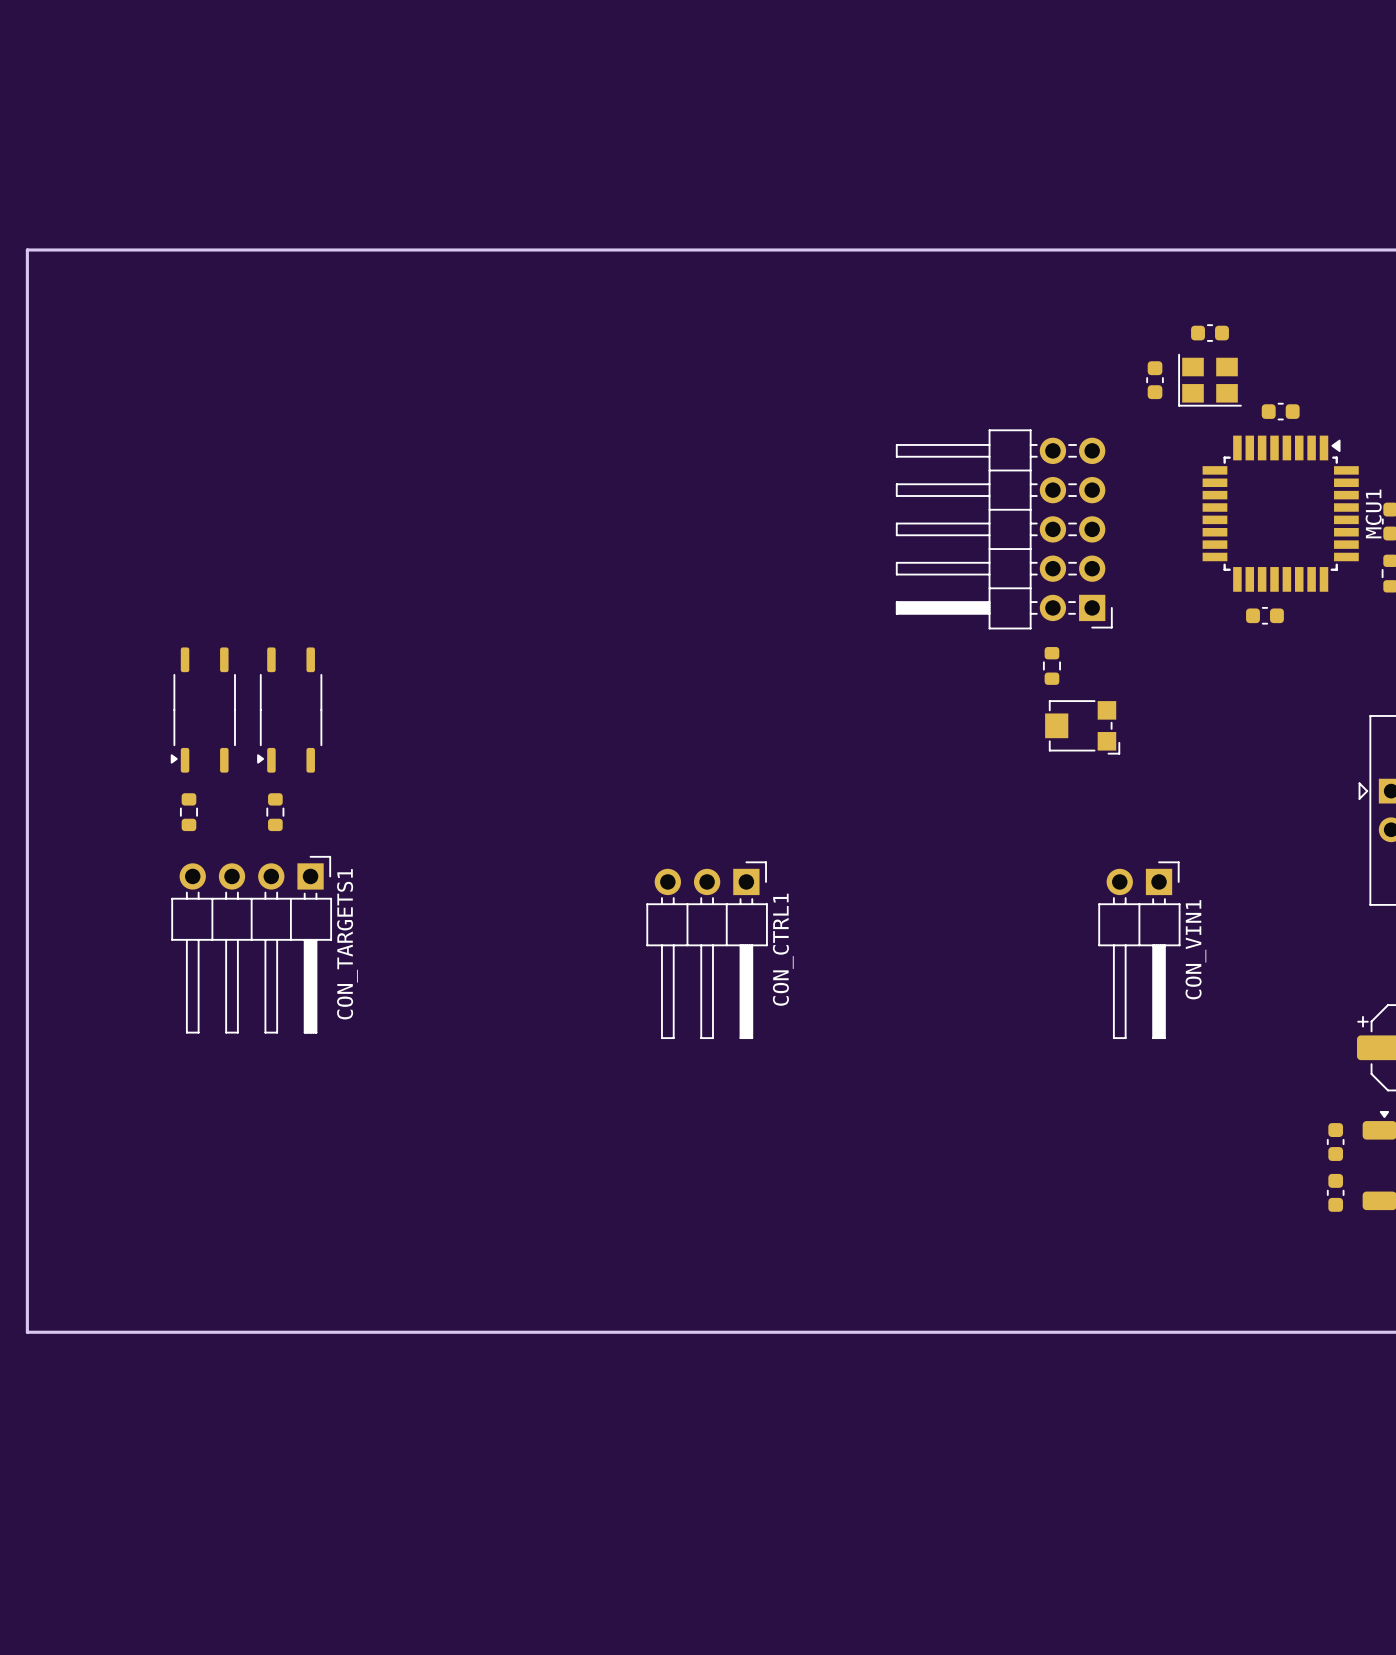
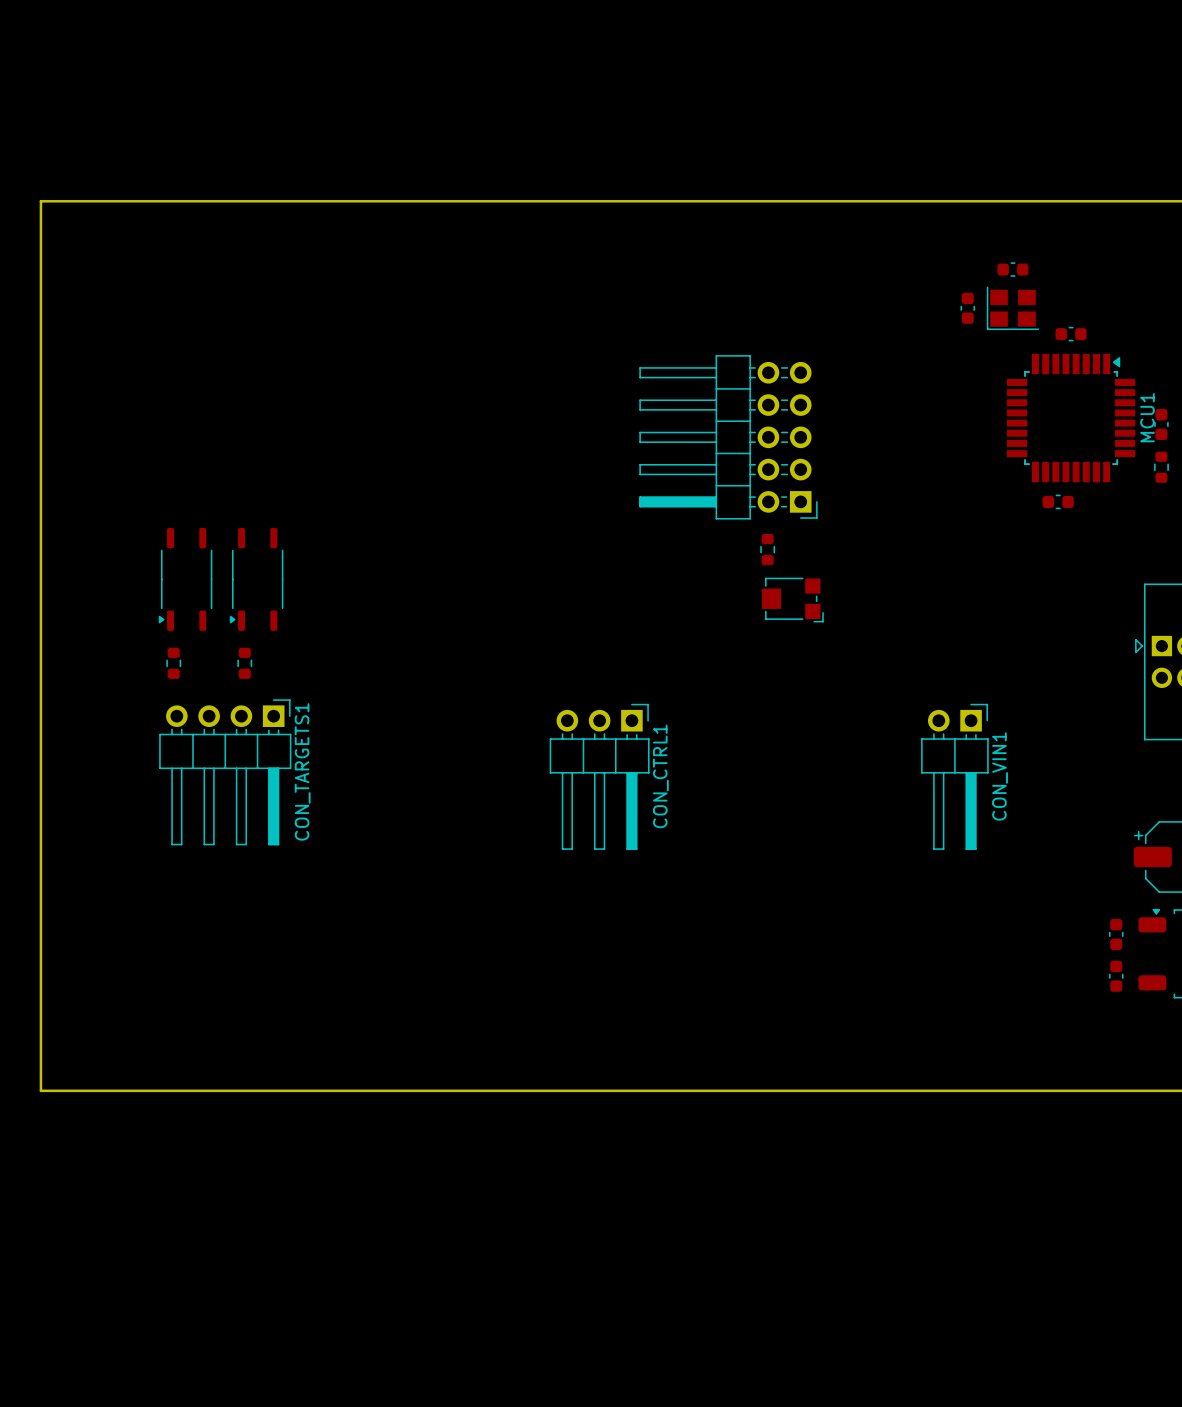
part position: (1004, 529) -> (728, 437)
part position: (1051, 665) -> (767, 549)
part position: (1082, 727) -> (792, 600)

